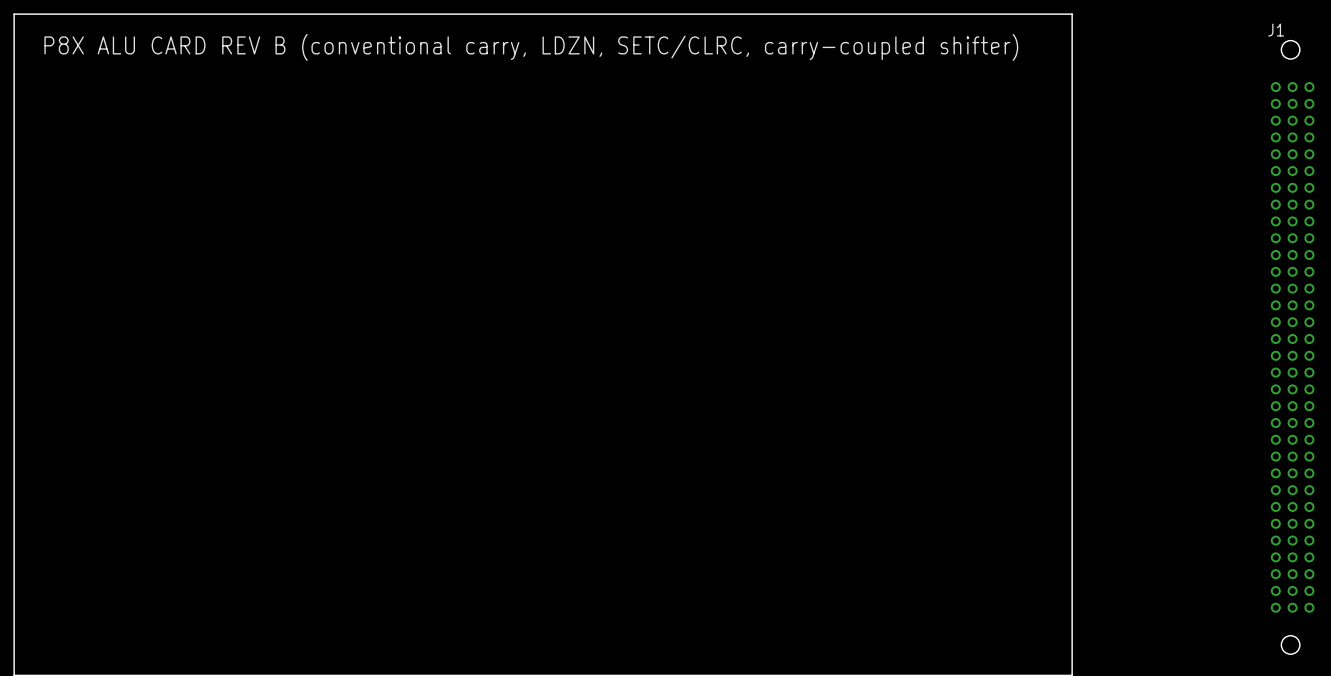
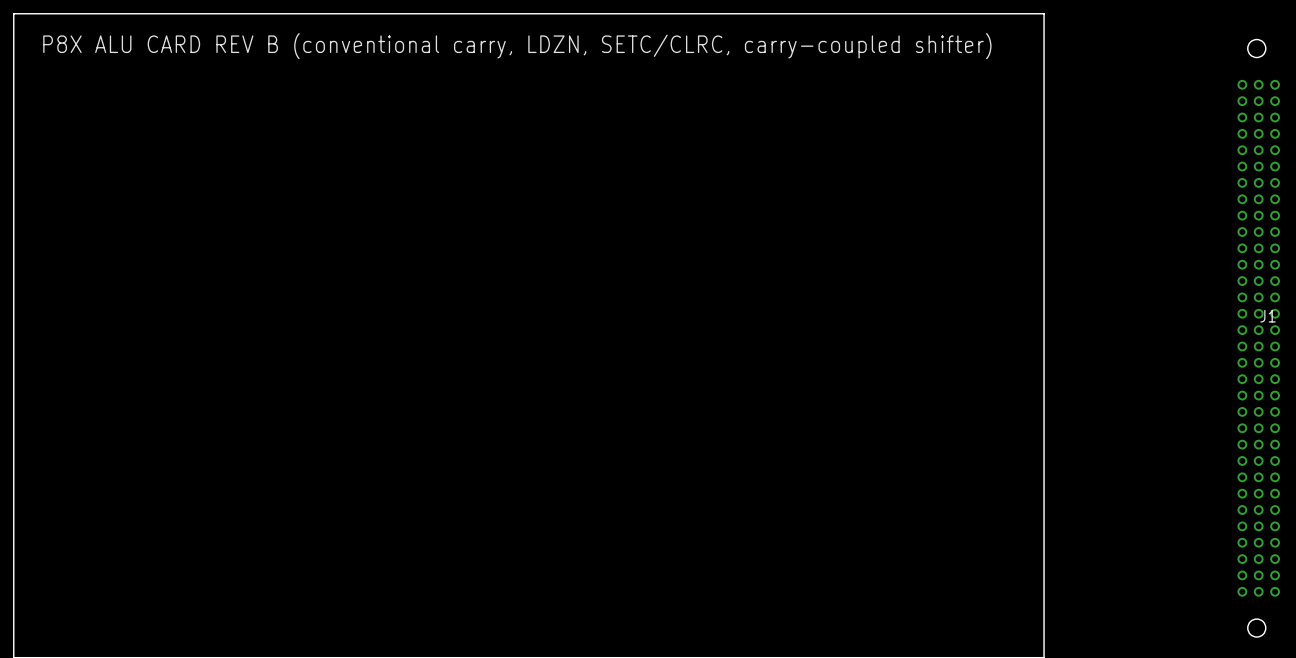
J1 name position: J1 (1276, 30) -> J1 (1268, 316)

